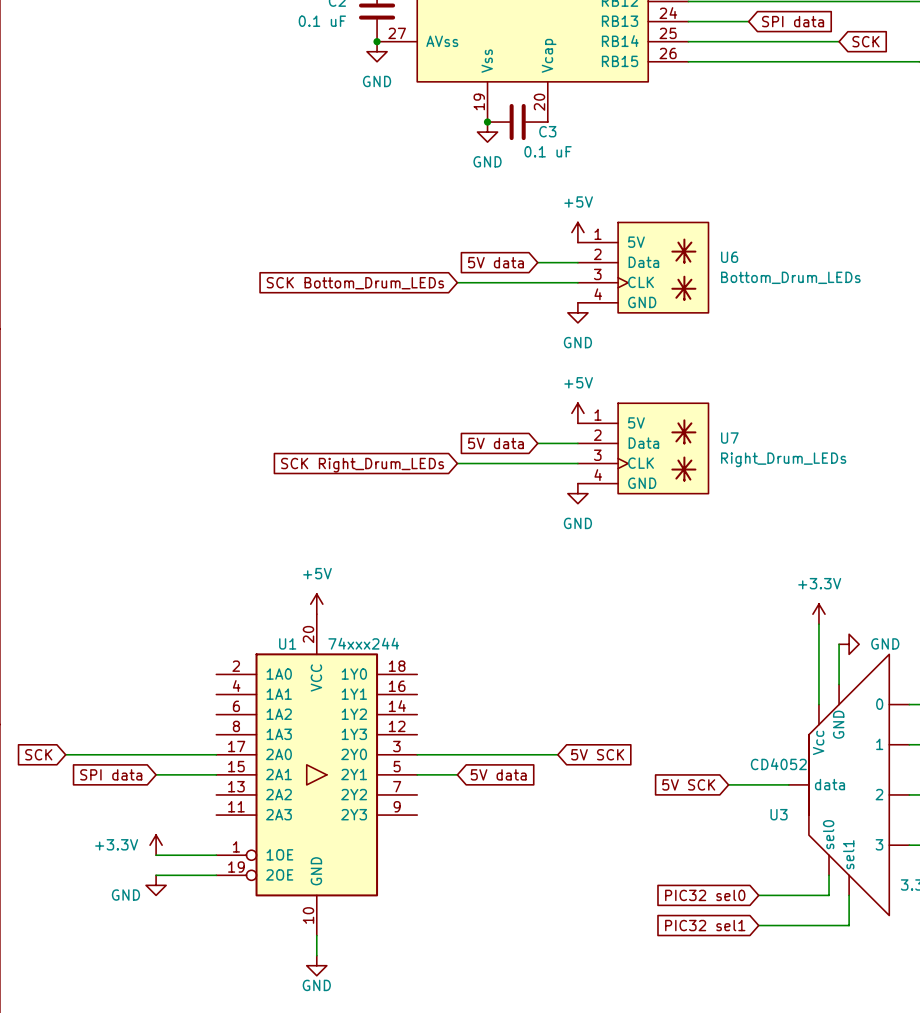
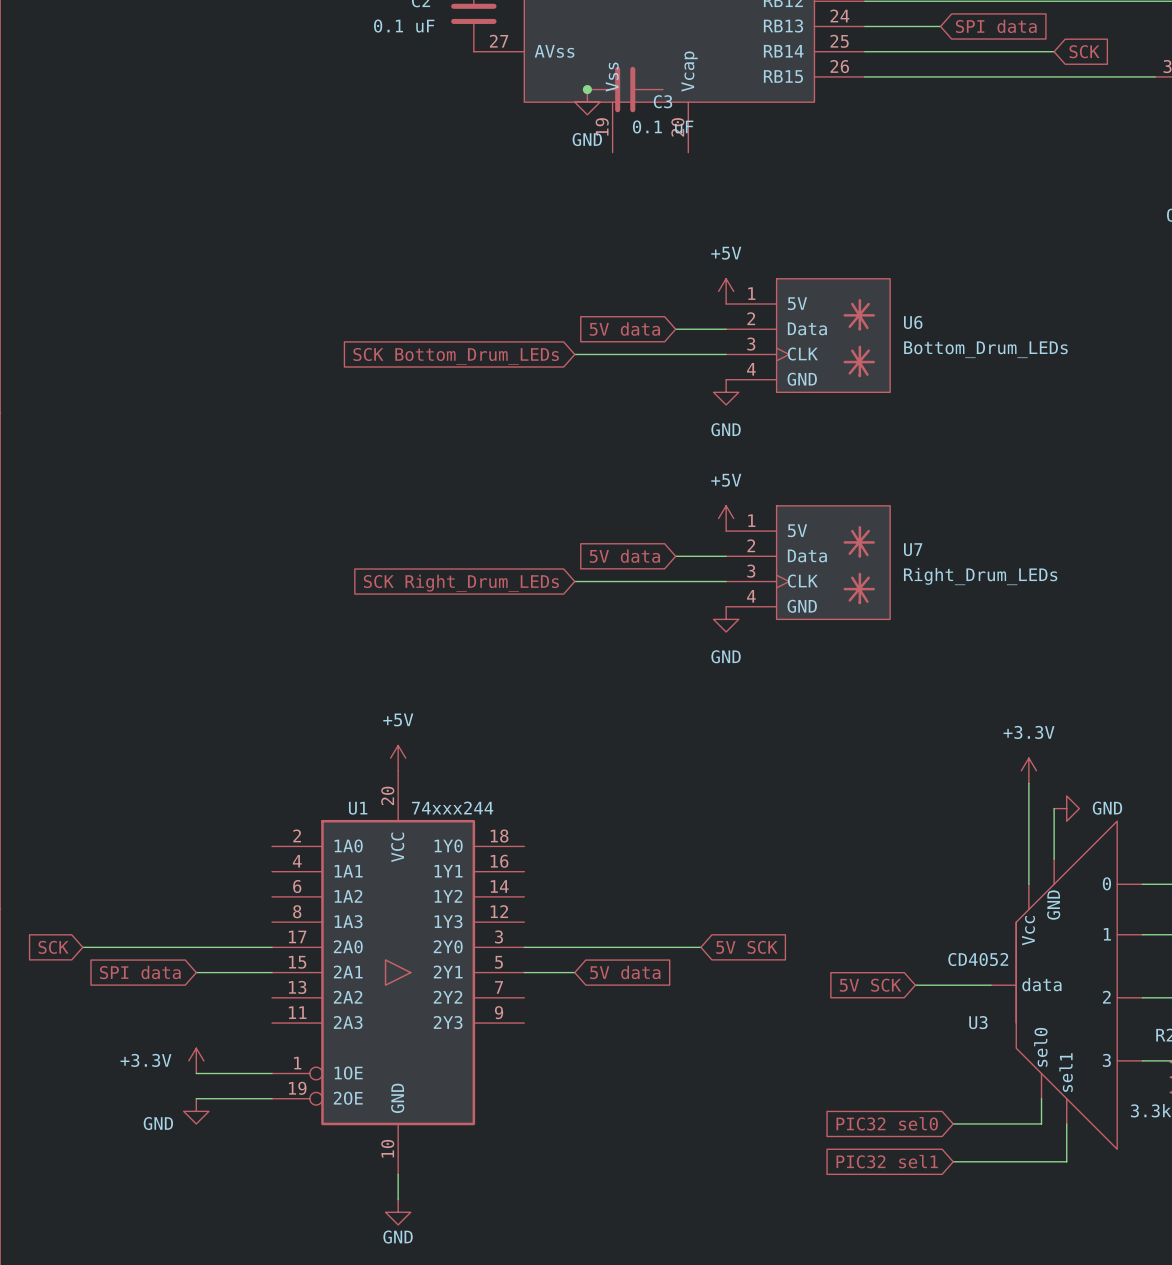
junction: (377, 41) -> none
power symbol: GND (377, 51) -> none
junction: none -> (587, 89)
power symbol: none -> GND (587, 102)
junction: (487, 122) -> none
C3 position: (517, 122) -> (625, 89)
power symbol: GND (487, 132) -> none

